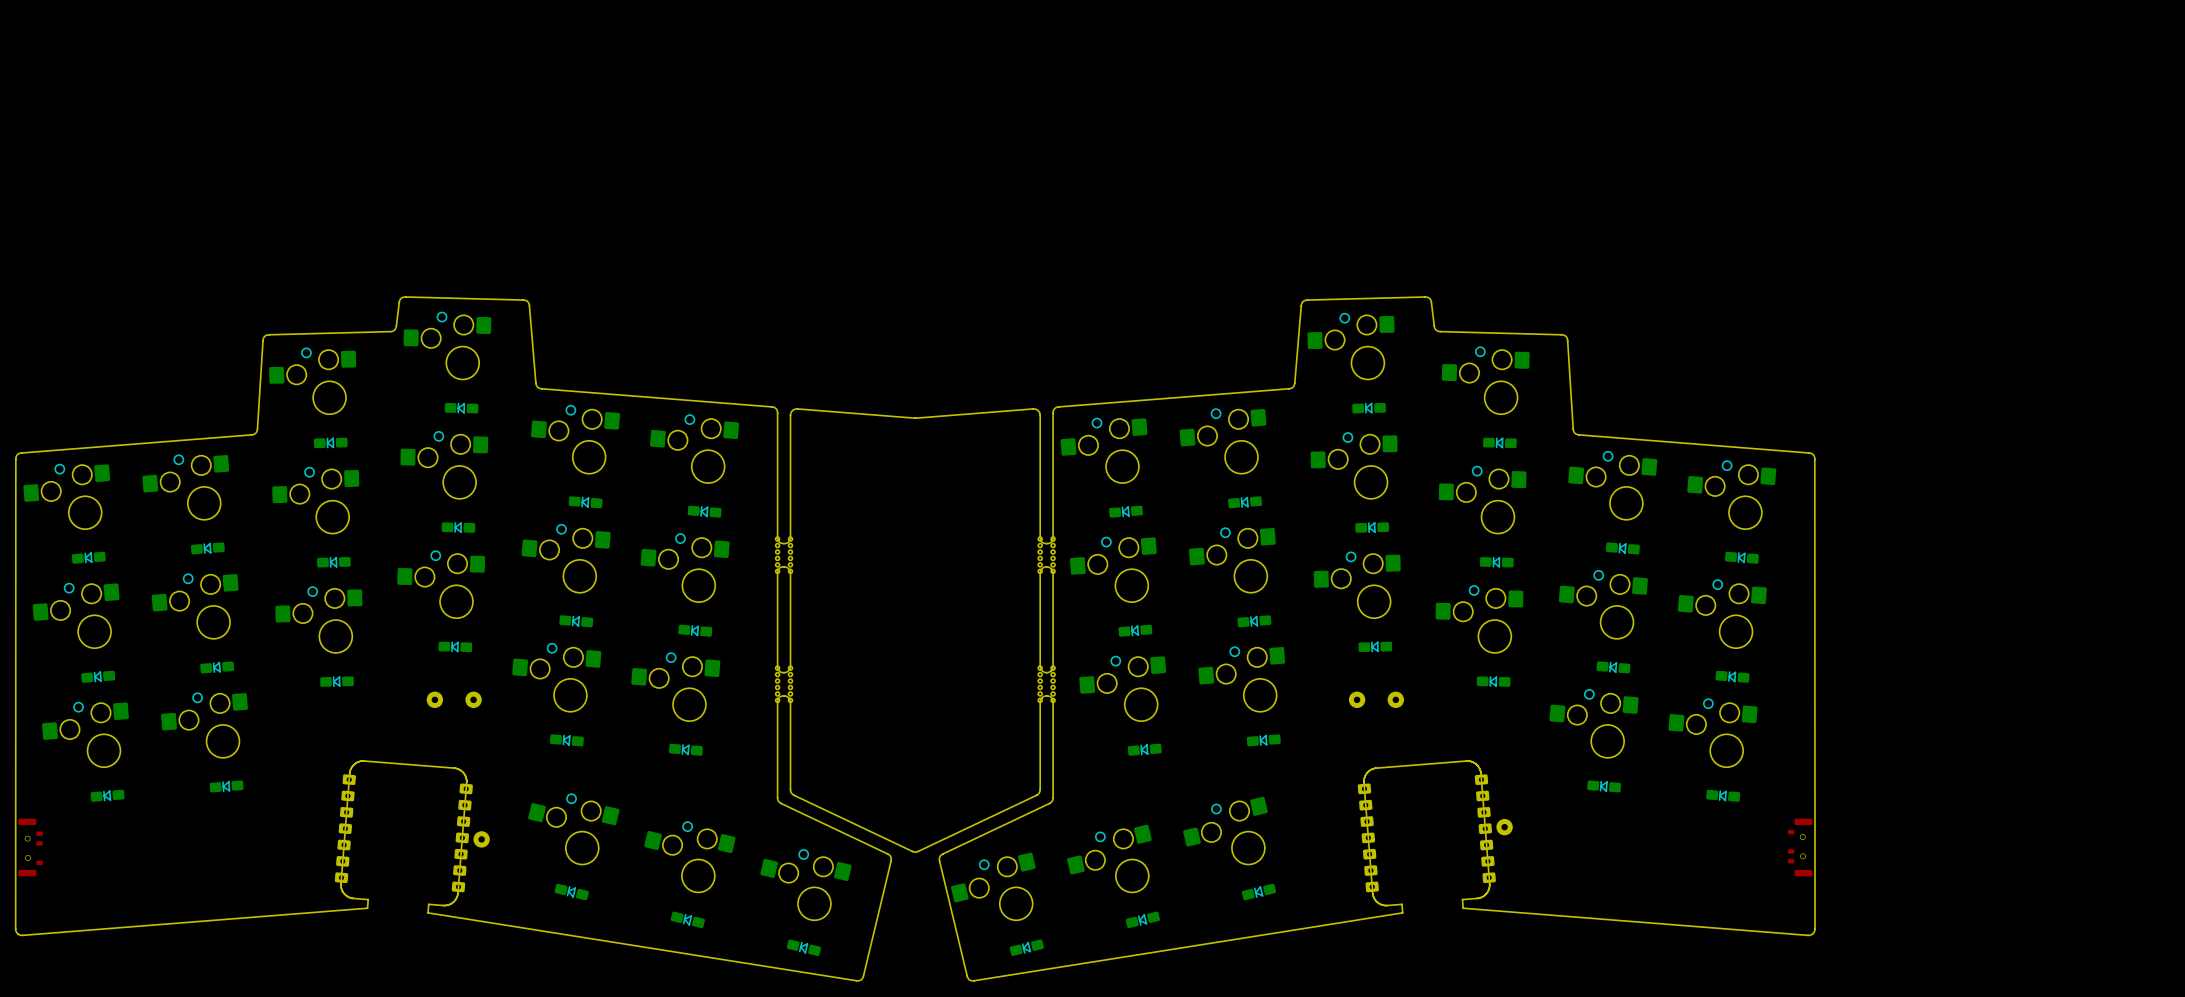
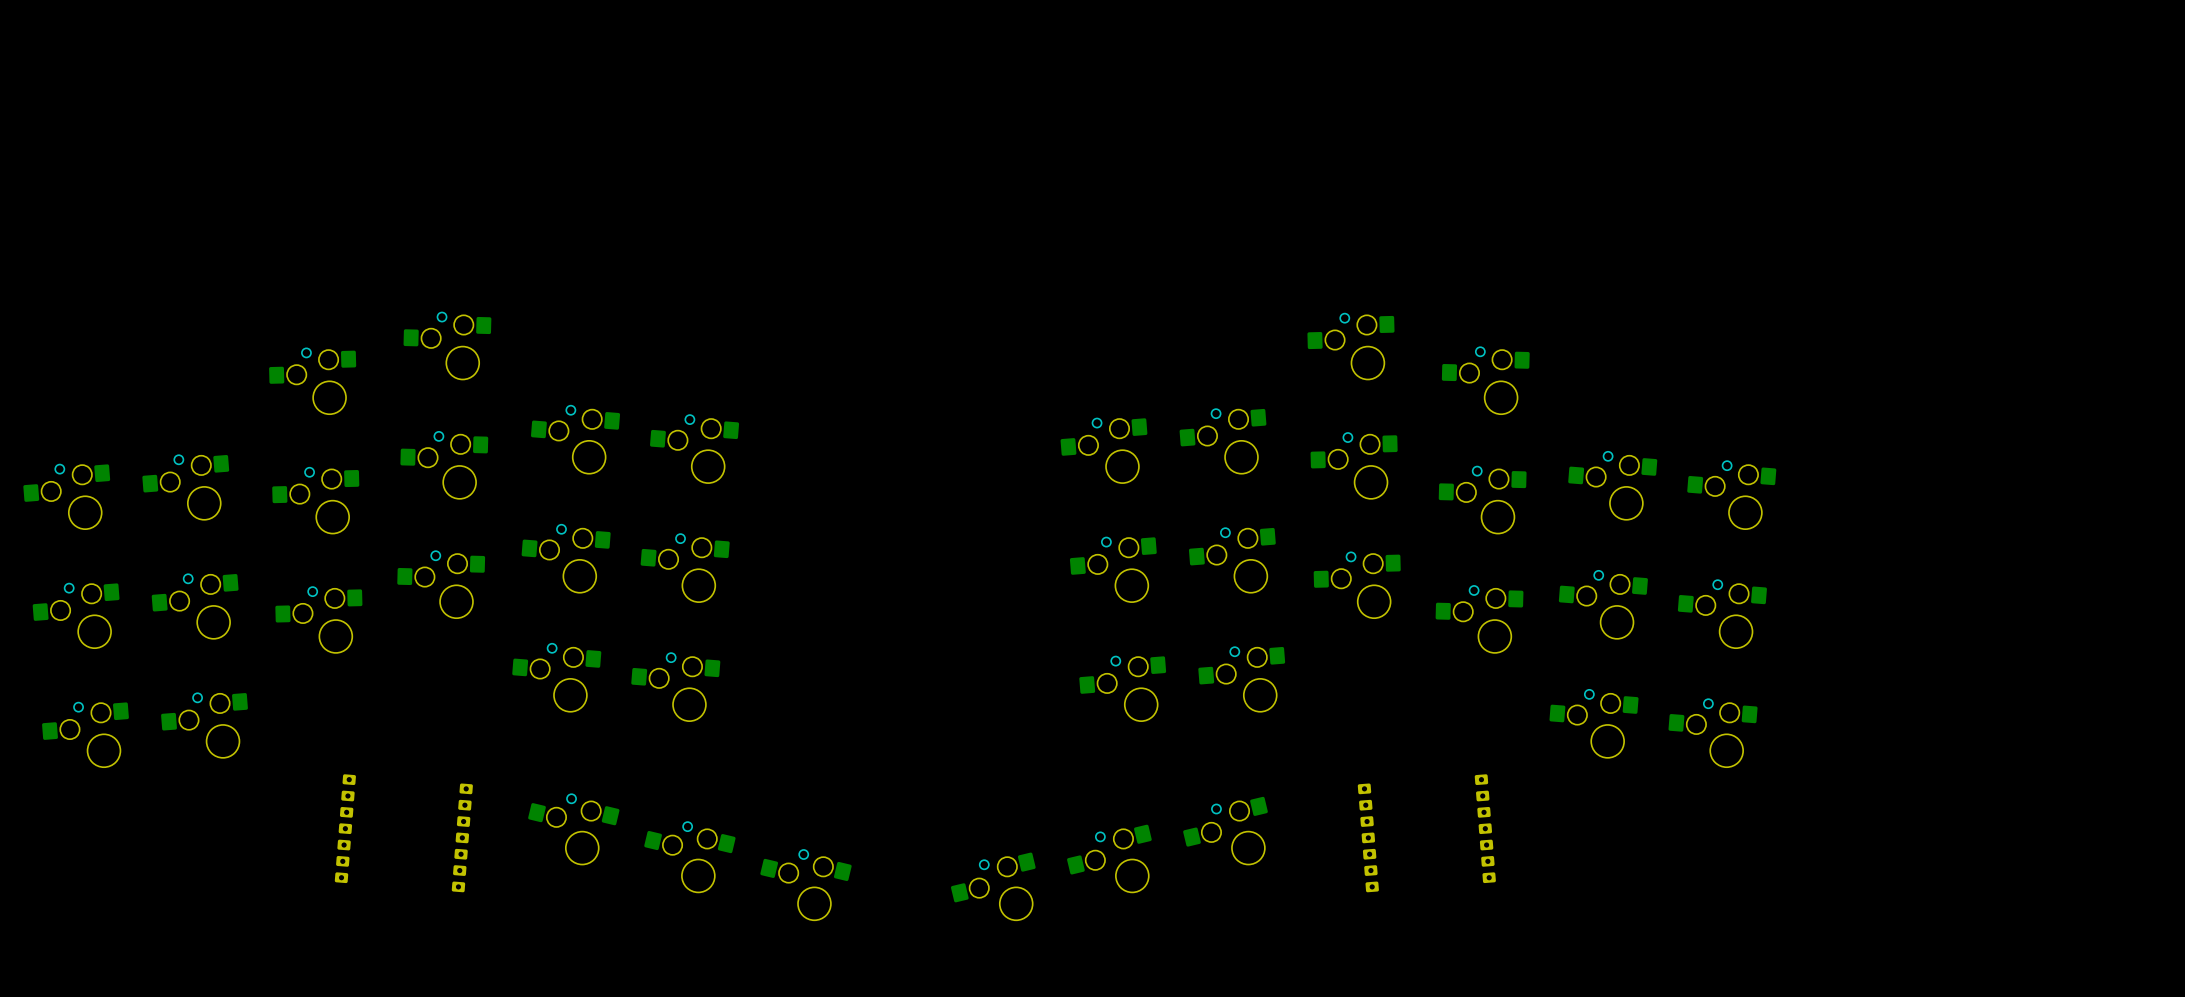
board edge: (1424, 296) (1303, 301) (1301, 305) (1294, 383) (1290, 388) (1055, 408) (1053, 413) (1053, 537) (1051, 541) (1047, 543) (1042, 542) (1040, 537) (1040, 415) (1035, 409) (915, 418) (793, 409) (790, 415) (790, 537) (788, 542) (783, 543) (779, 541) (777, 537) (777, 413) (775, 408) (539, 388) (535, 383) (529, 305) (525, 300) (404, 297) (399, 300) (396, 327) (392, 331) (266, 335) (263, 340) (257, 428) (254, 434) (21, 452) (16, 456) (16, 931) (22, 935) (367, 908) (368, 899) (347, 896) (342, 891) (340, 884) (349, 772) (355, 763) (364, 761) (455, 768) (461, 770) (465, 776) (466, 782) (457, 895) (453, 901) (448, 905) (428, 904) (428, 912) (859, 980) (863, 975) (891, 857) (887, 853) (778, 801) (778, 698) (785, 696) (790, 701) (791, 793) (915, 852) (1038, 793) (1040, 701) (1042, 697) (1046, 695) (1051, 697) (1053, 701) (1052, 801) (943, 853) (939, 857) (967, 975) (971, 980) (1402, 912) (1401, 904) (1382, 905) (1376, 901) (1373, 895) (1364, 782) (1365, 776) (1369, 770) (1375, 768) (1466, 761) (1475, 763) (1480, 772) (1489, 884) (1488, 891) (1482, 896) (1462, 899) (1463, 908) (1811, 934) (1815, 928) (1813, 455) (1808, 452) (1576, 434) (1573, 429) (1565, 336) (1438, 331) (1434, 327) (1431, 300) (1424, 296) -> none
part: (461, 408) -> none
part: (1369, 408) -> none
part: (330, 442) -> none
part: (1499, 442) -> none
part: (585, 502) -> none
part: (1245, 502) -> none
part: (704, 511) -> none
part: (1126, 511) -> none
part: (458, 527) -> none
part: (1372, 527) -> none
part: (207, 548) -> none
part: (1622, 548) -> none
part: (777, 555) -> none
part: (790, 555) -> none
part: (1040, 555) -> none
part: (1053, 555) -> none
part: (88, 557) -> none
part: (1741, 557) -> none
part: (333, 562) -> none
part: (1496, 562) -> none
board edge: (784, 566) (779, 568) (777, 573) (777, 666) (779, 671) (784, 672) (788, 670) (790, 666) (790, 572) (788, 568) (784, 566) -> none
board edge: (1046, 566) (1042, 568) (1040, 572) (1040, 666) (1042, 670) (1046, 672) (1050, 671) (1053, 666) (1053, 573) (1051, 568) (1046, 566) -> none
part: (576, 621) -> none
part: (1254, 621) -> none
part: (695, 630) -> none
part: (1135, 630) -> none
part: (455, 646) -> none
part: (1375, 646) -> none
part: (217, 667) -> none
part: (1613, 667) -> none
part: (98, 676) -> none
part: (1732, 676) -> none
part: (337, 681) -> none
part: (1493, 681) -> none
part: (777, 684) -> none
part: (790, 684) -> none
part: (1040, 684) -> none
part: (1053, 684) -> none
part: (434, 699) -> none
part: (473, 699) -> none
part: (1357, 699) -> none
part: (1395, 699) -> none
part: (566, 740) -> none
part: (1263, 740) -> none
part: (685, 749) -> none
part: (1144, 749) -> none
part: (226, 786) -> none
part: (1604, 786) -> none
part: (107, 795) -> none
part: (1723, 795) -> none
part: (1504, 827) -> none
part: (481, 839) -> none
part: (30, 847) -> none
part: (1800, 847) -> none
part: (571, 892) -> none
part: (1258, 892) -> none
part: (687, 919) -> none
part: (1142, 919) -> none
part: (803, 947) -> none
part: (1026, 947) -> none

